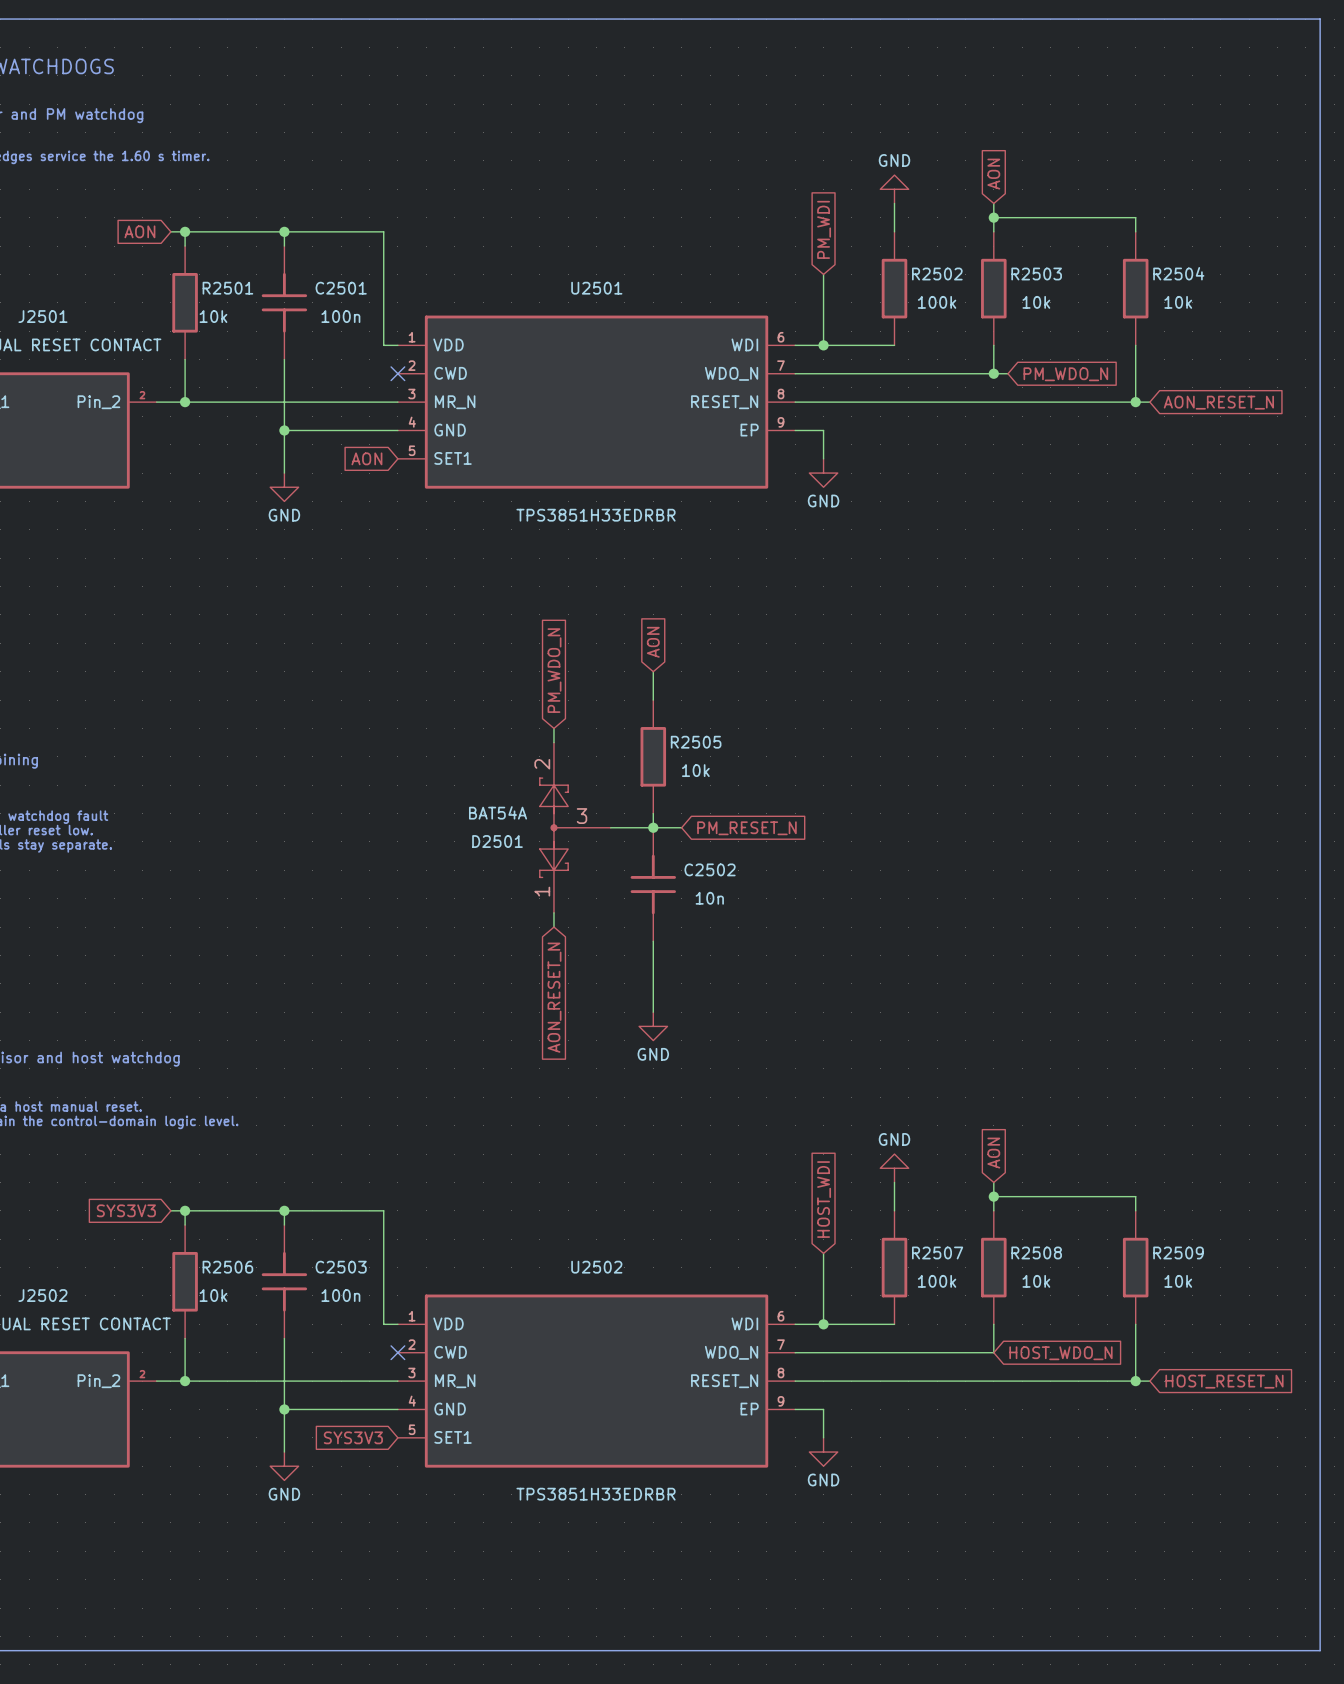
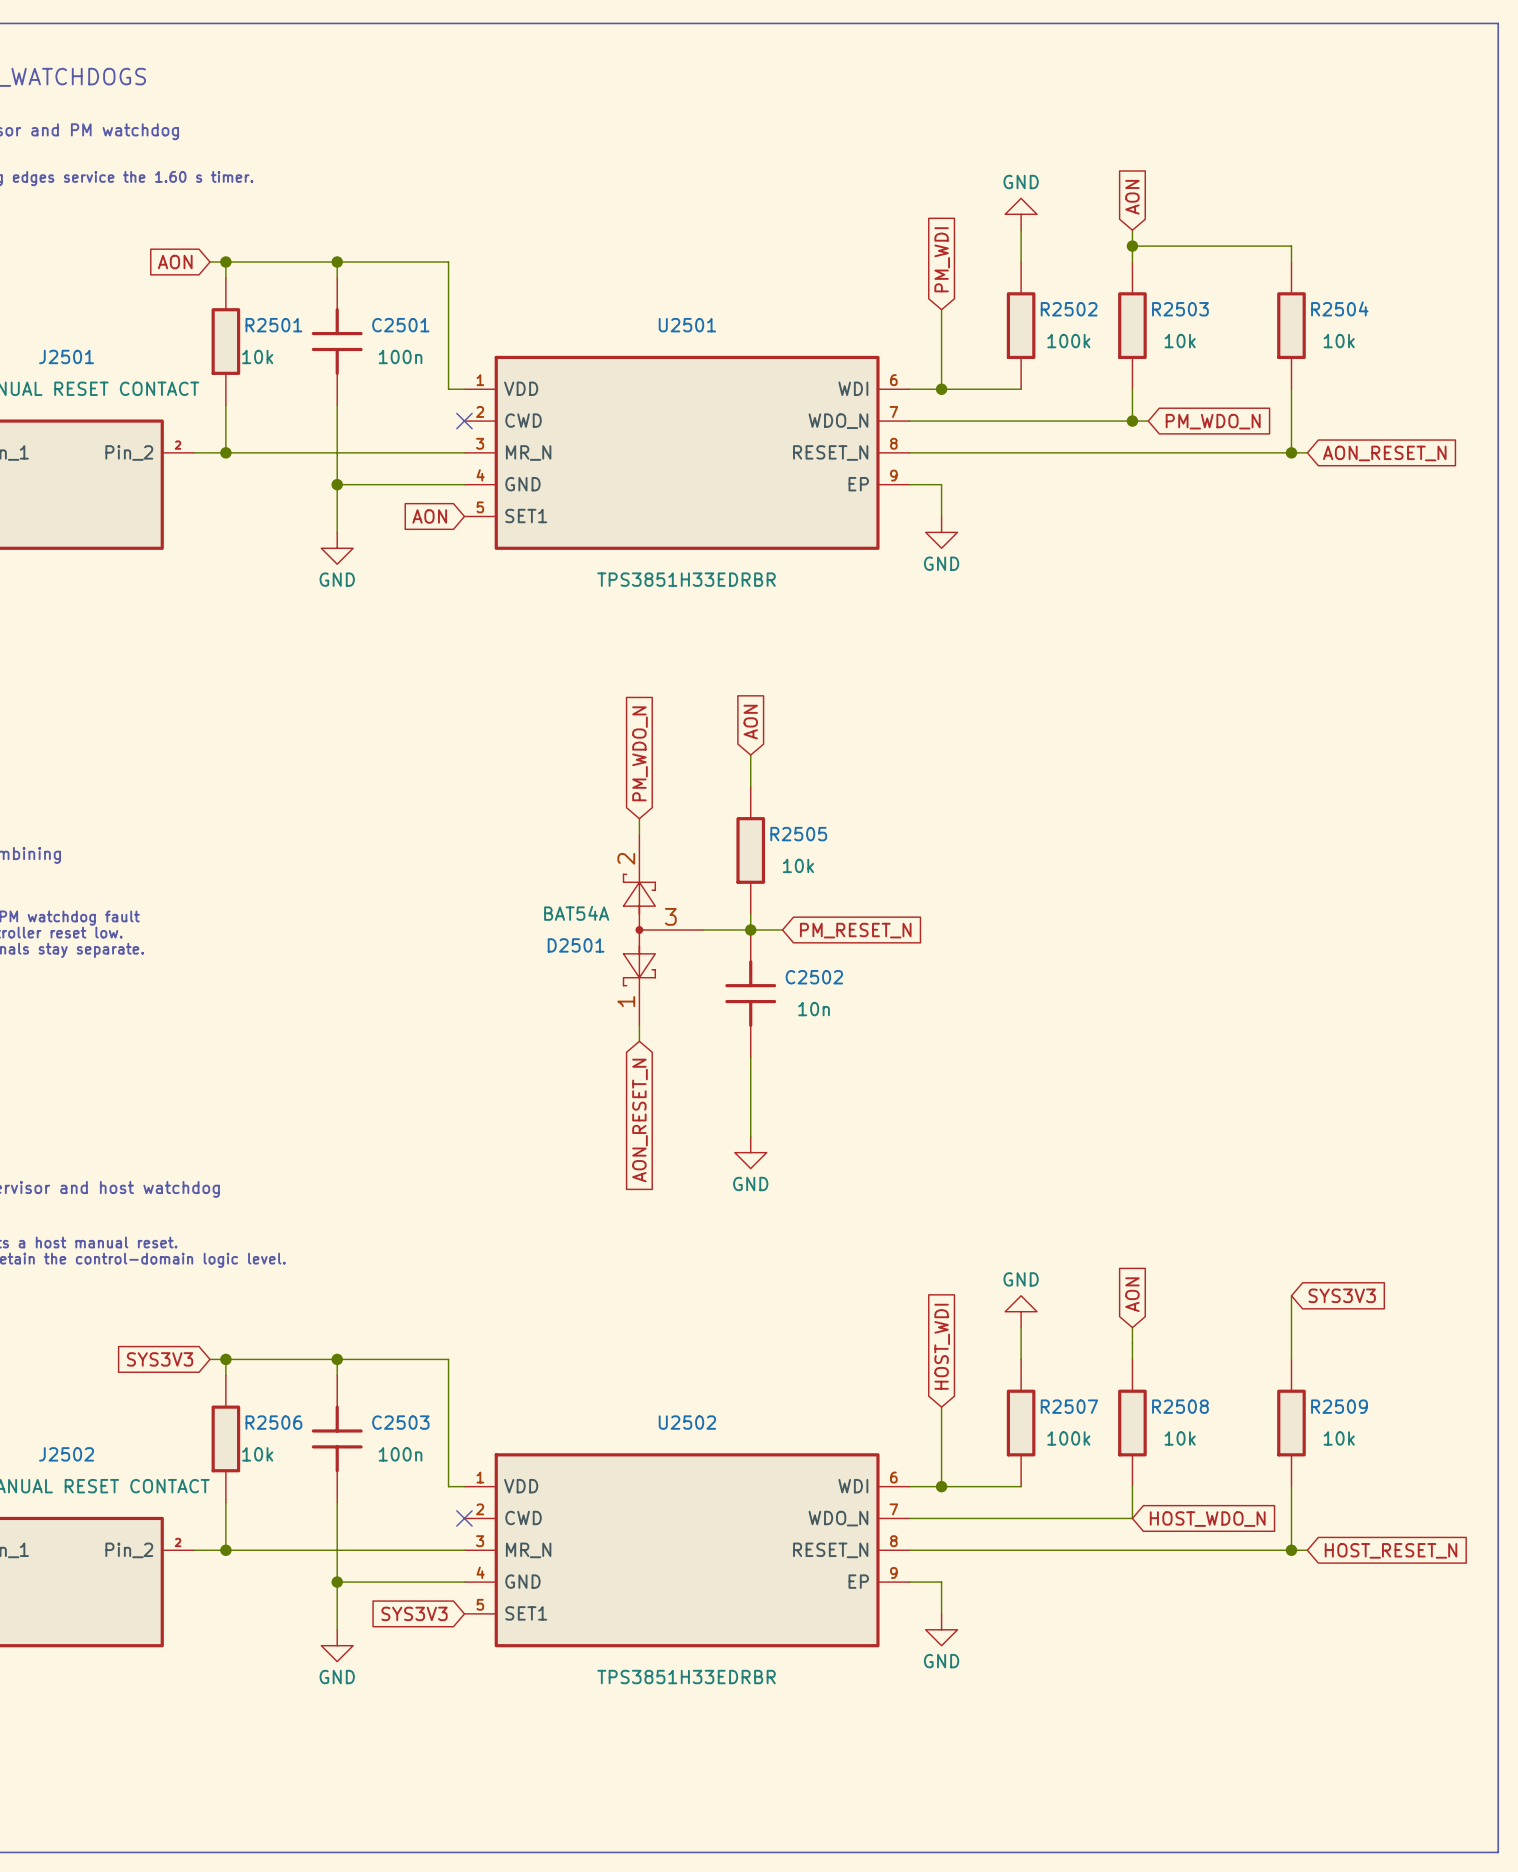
global label: none -> SYS3V3 (1342, 1295)
wire: (993, 1196) (1135, 1196) -> (1291, 1295) (1291, 1343)
junction: (993, 1196) -> none

